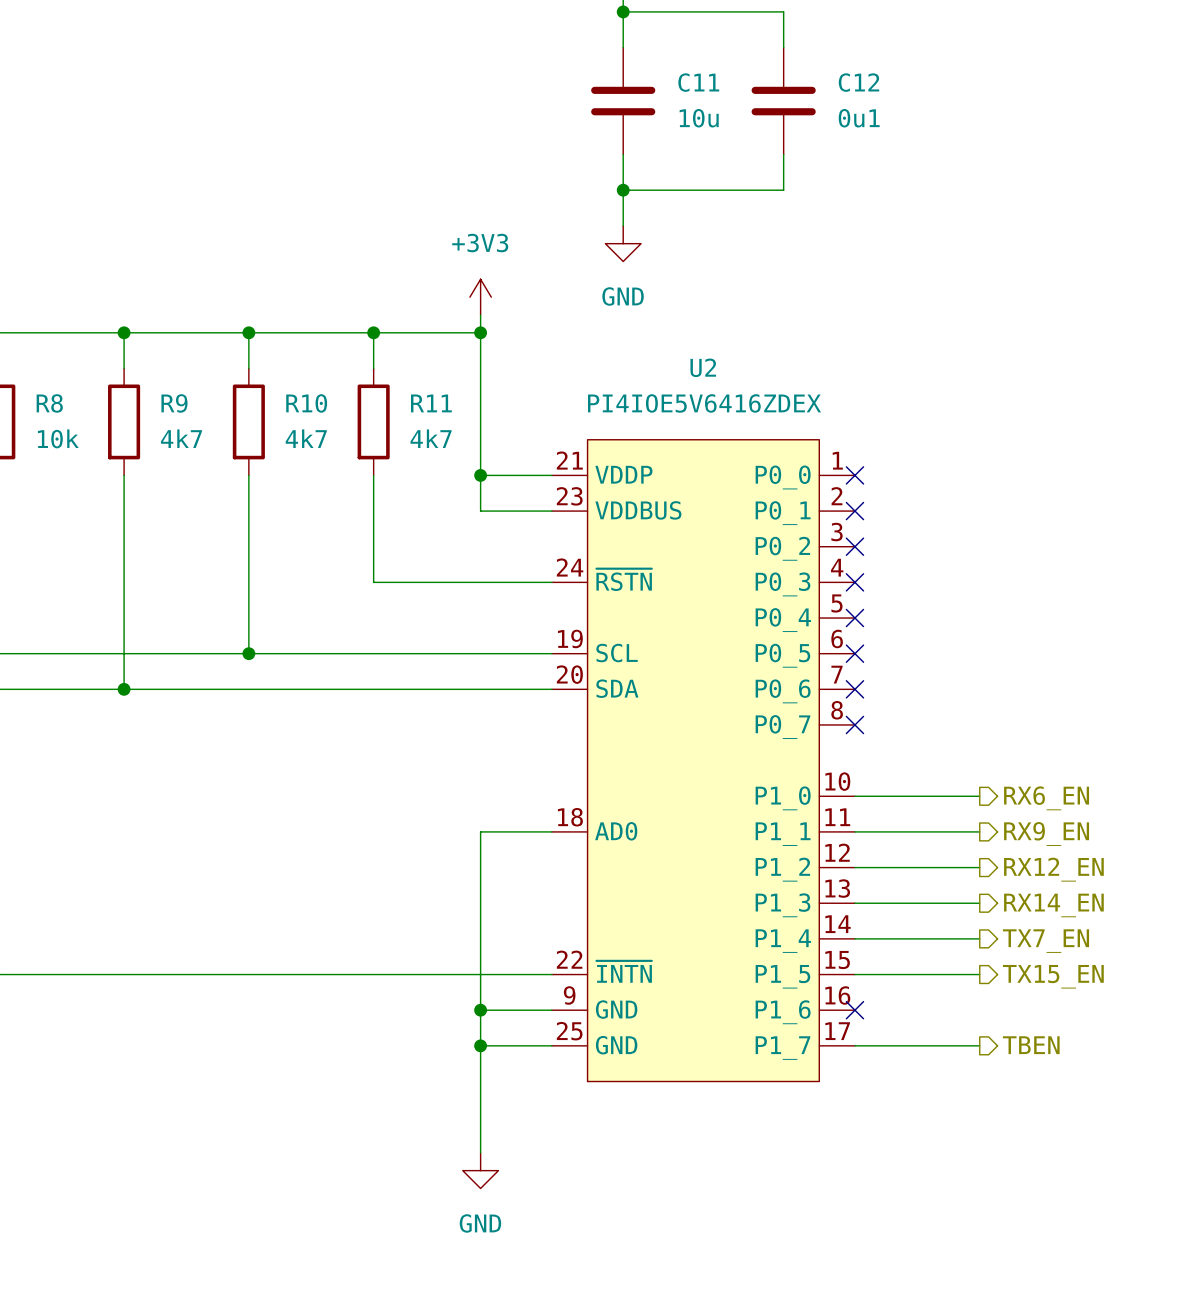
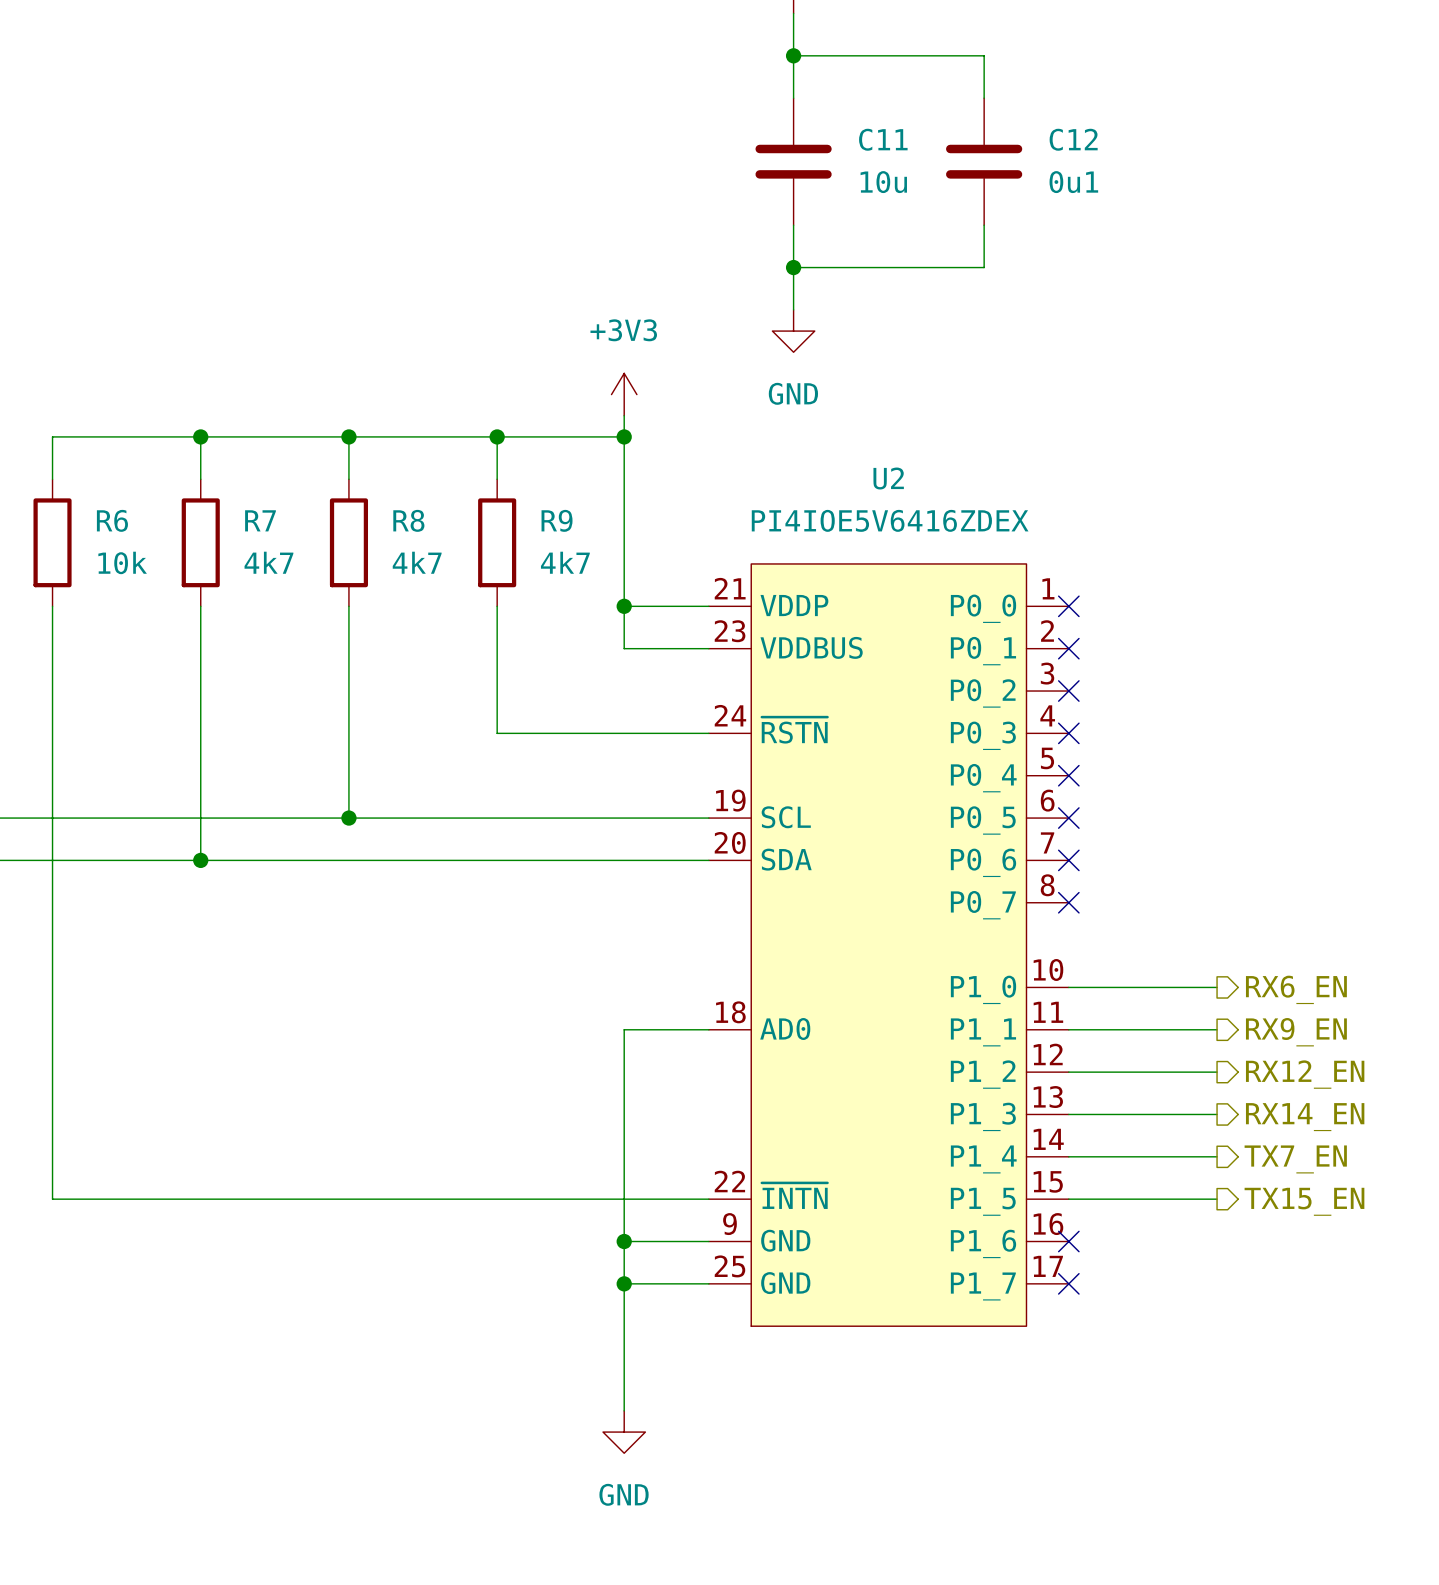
R8 name: R8 (49, 403) -> R6 (112, 520)
R9 name: R9 (174, 403) -> R7 (260, 520)
R10 name: R10 (306, 403) -> R8 (408, 520)
R11 name: R11 (431, 403) -> R9 (557, 520)
wire: (854, 1045) (979, 1045) -> none
no-connect mark: none -> (1068, 1283)
hierarchical label: TBEN (1031, 1045) -> none

